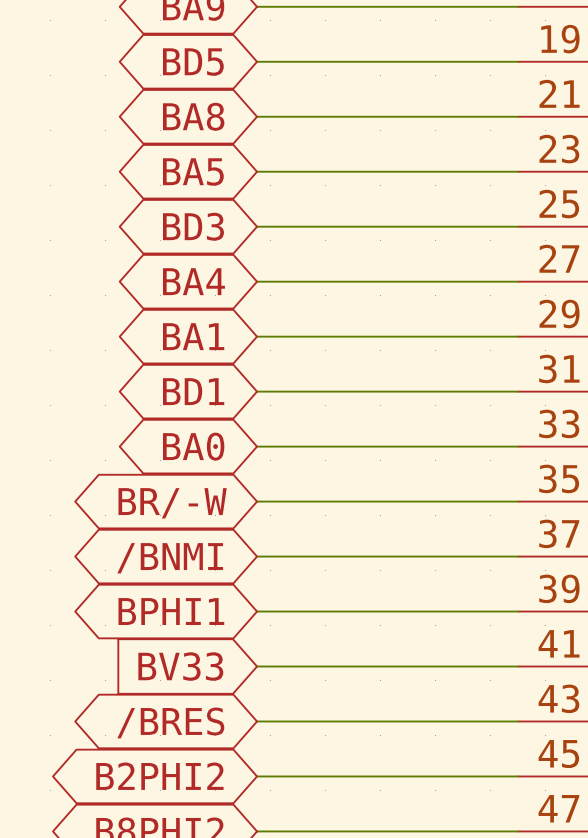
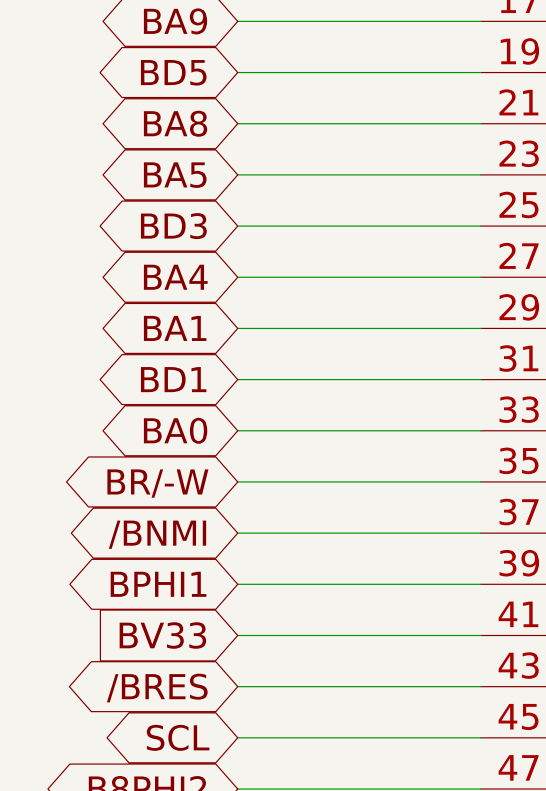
global label: B2PHI2 (159, 776) -> SCL (178, 737)

